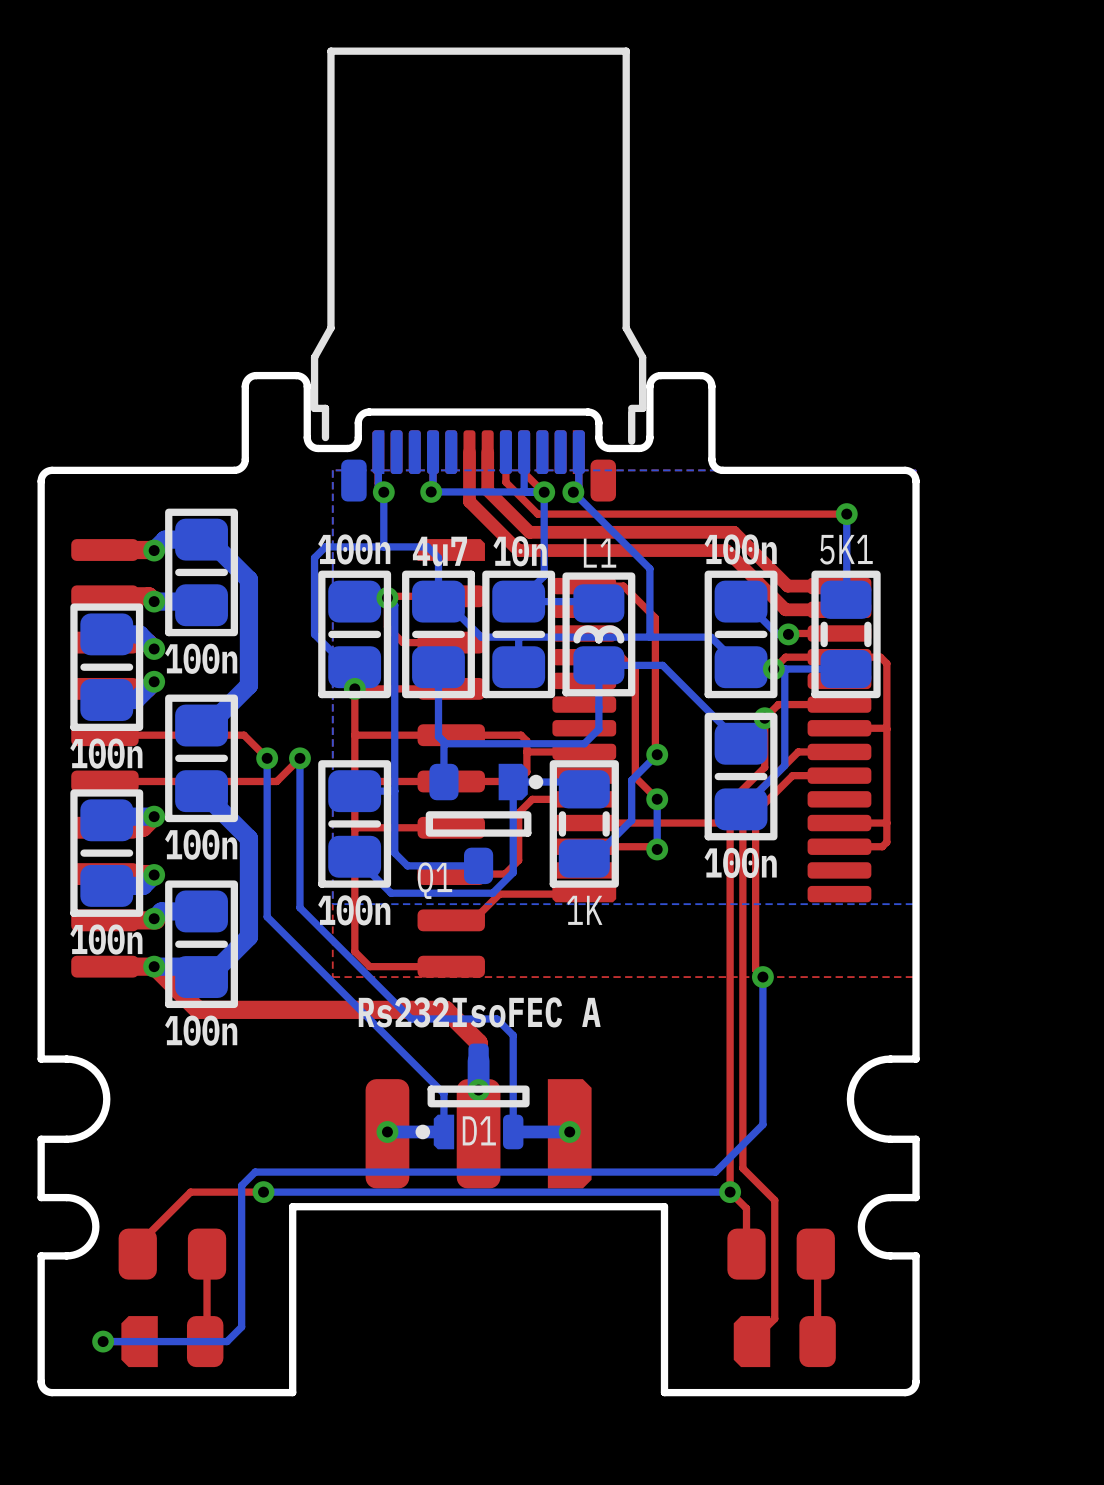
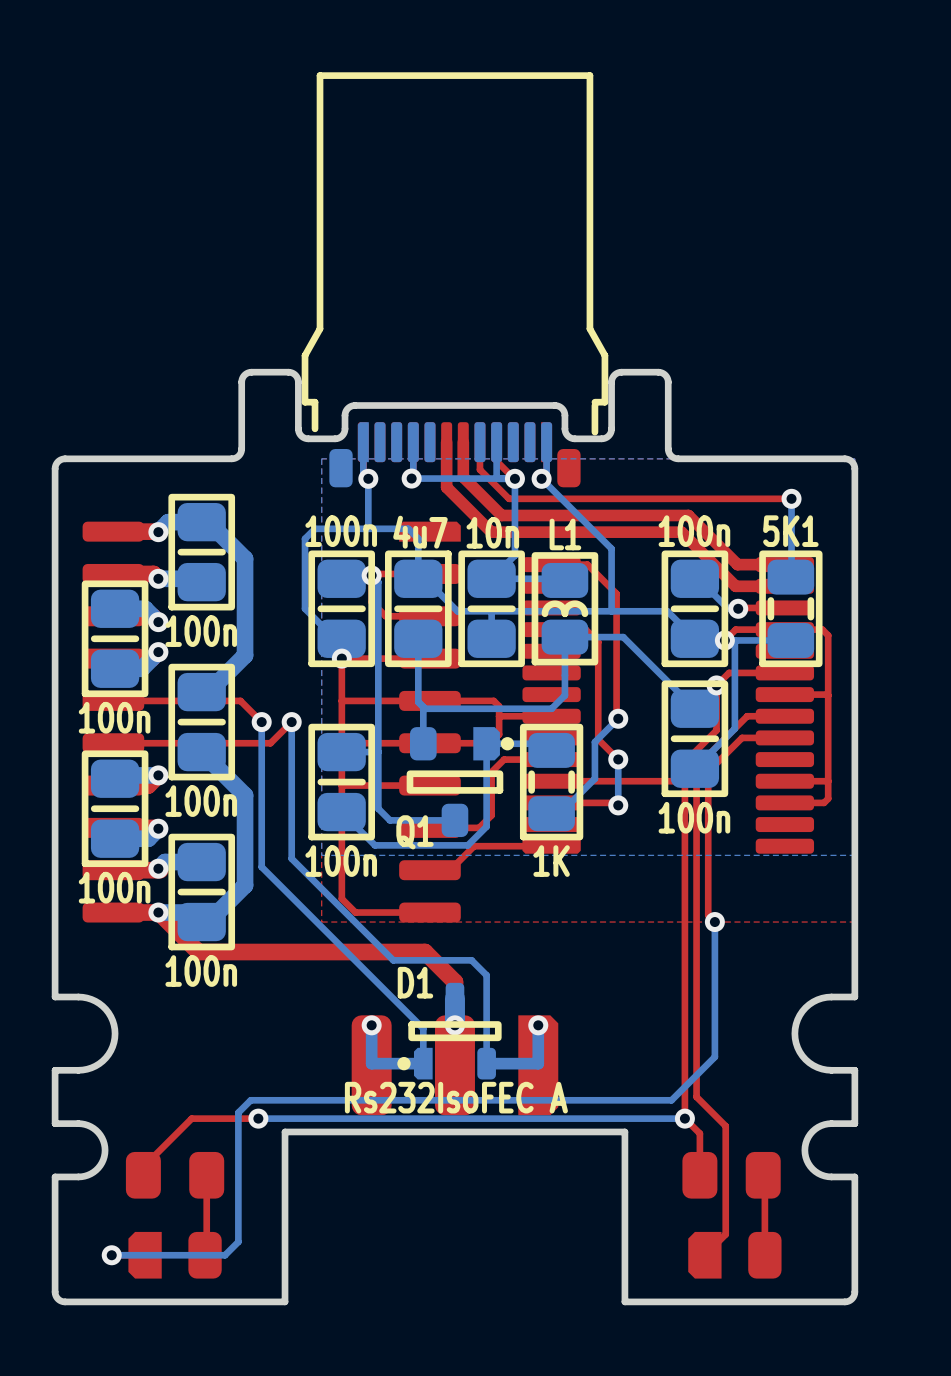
text position: Rs232IsoFEC A (479, 1012) -> Rs232IsoFEC A (456, 1097)
bottom track: none -> (371, 1025) (371, 1063)
bottom track: none -> (538, 1025) (538, 1063)
D1 name position: D1 (479, 1130) -> D1 (415, 982)
via position: (387, 1131) -> (371, 1025)
via position: (569, 1131) -> (538, 1025)

